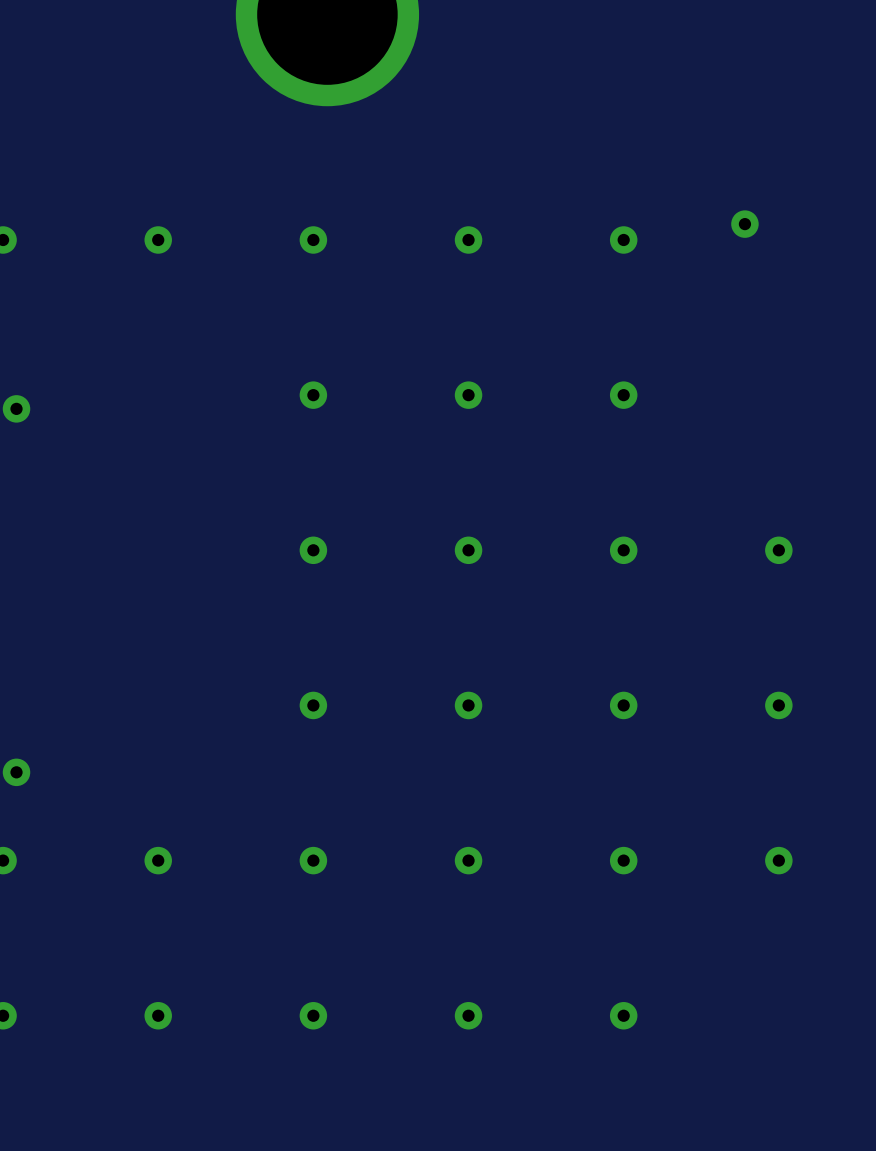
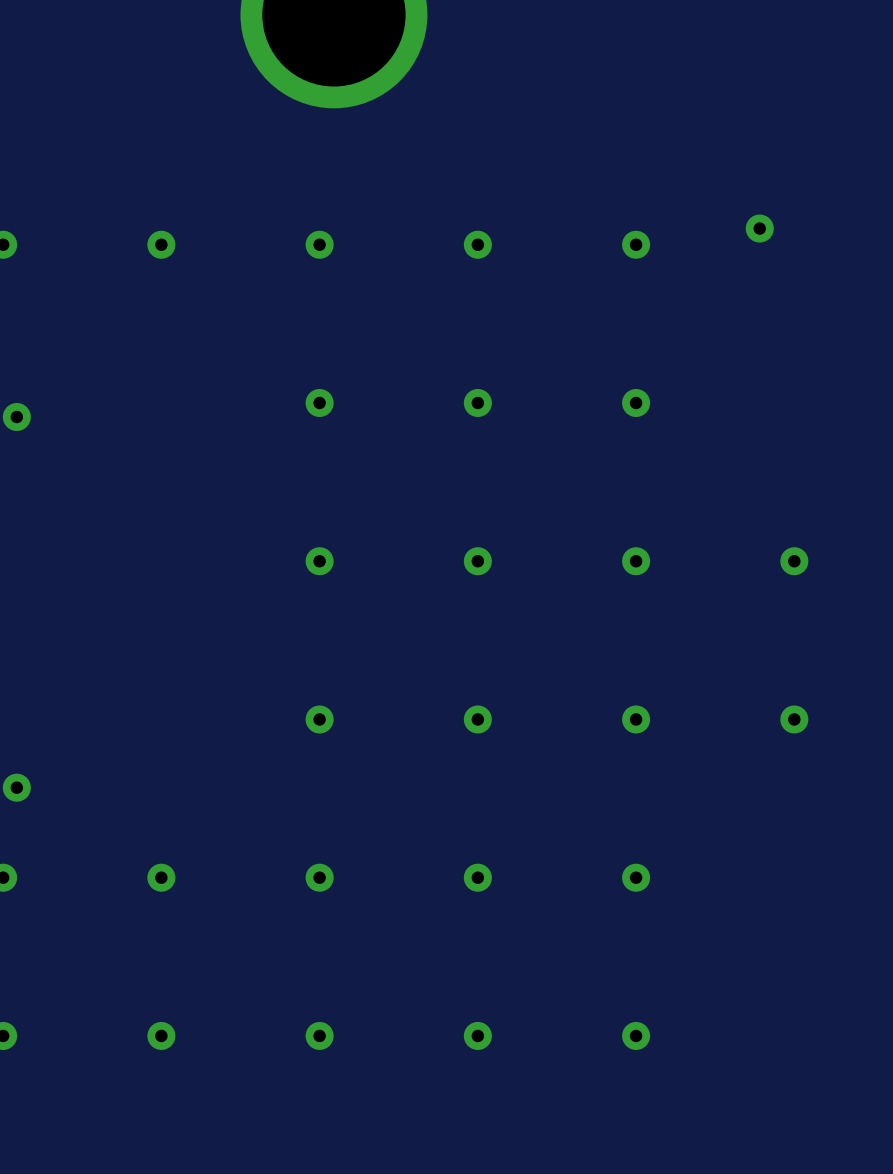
via: (778, 860) -> none

